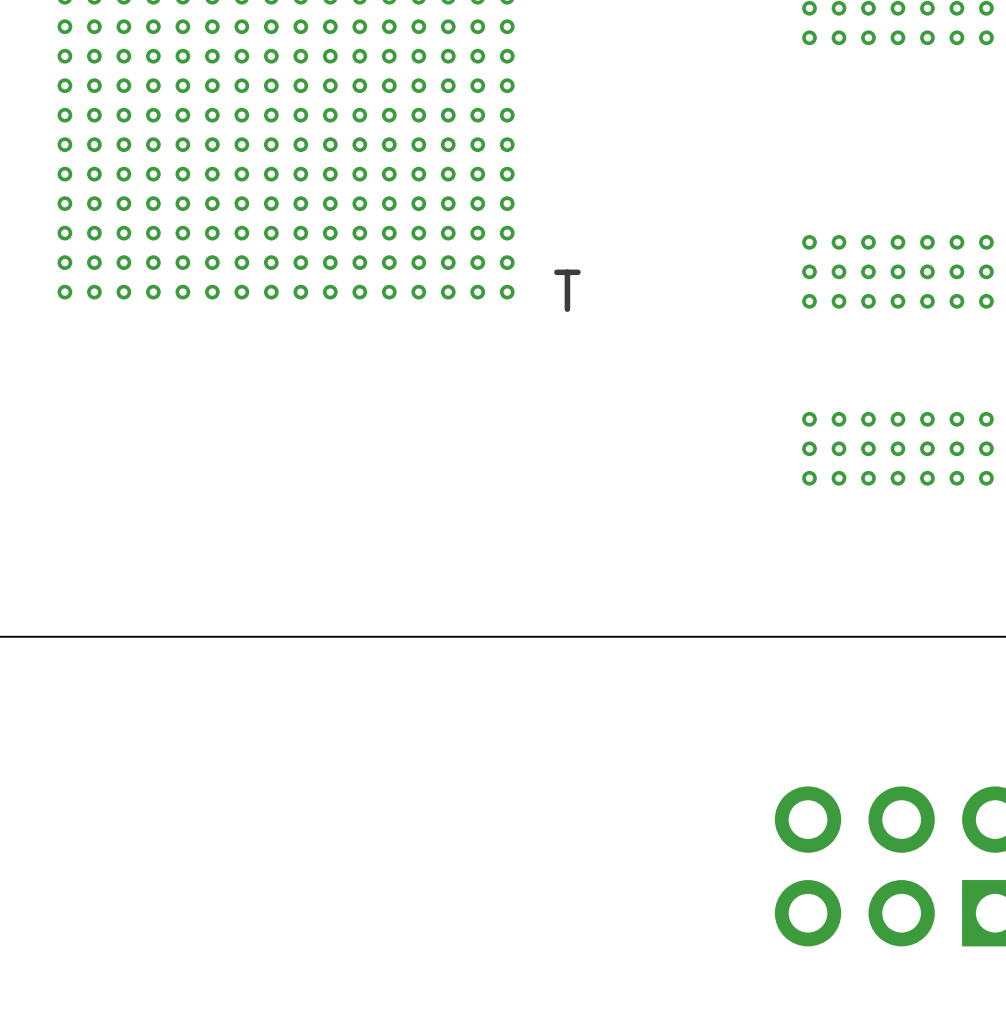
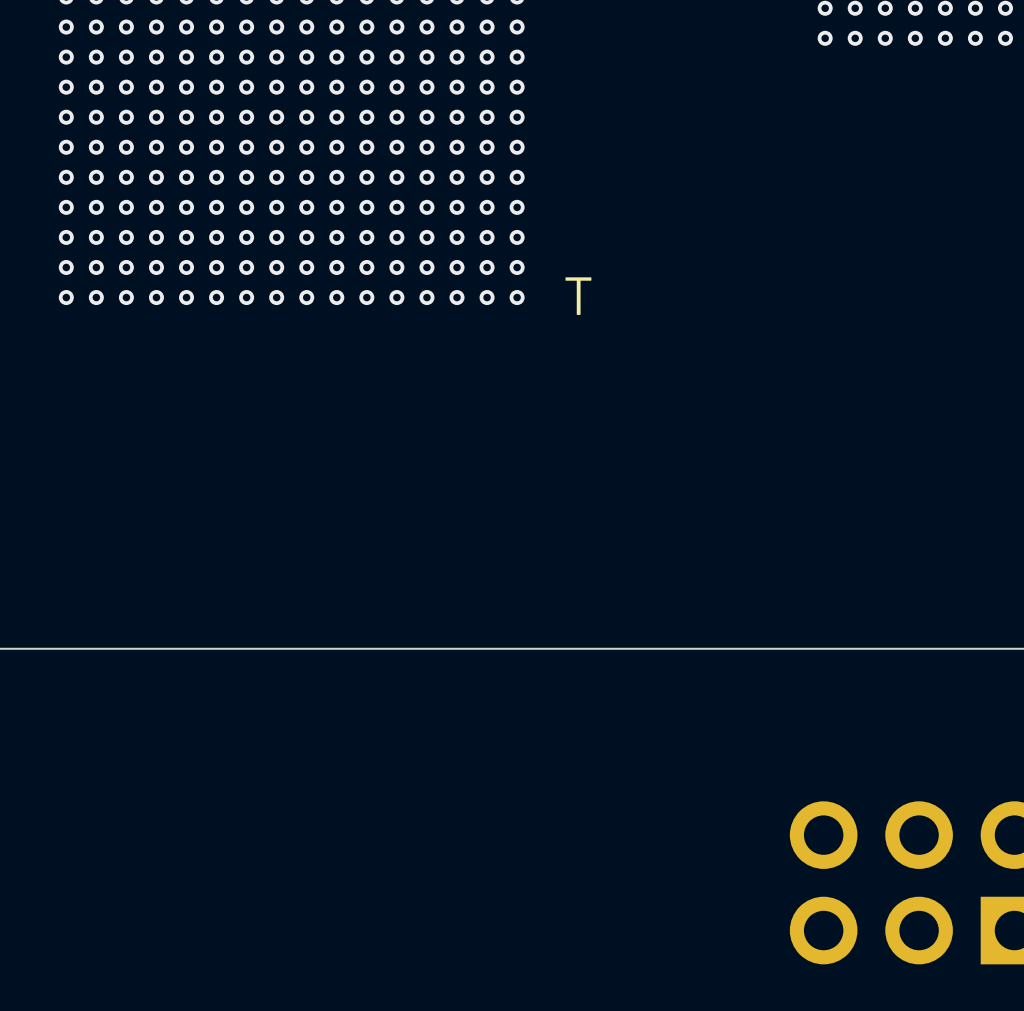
via: (809, 242) -> none
via: (838, 242) -> none
via: (868, 242) -> none
via: (897, 242) -> none
via: (927, 242) -> none
via: (956, 242) -> none
via: (986, 242) -> none
via: (809, 271) -> none
via: (838, 271) -> none
via: (868, 271) -> none
via: (897, 271) -> none
via: (927, 271) -> none
via: (956, 271) -> none
via: (986, 271) -> none
via: (809, 301) -> none
via: (838, 301) -> none
via: (868, 301) -> none
via: (897, 301) -> none
via: (927, 301) -> none
via: (956, 301) -> none
via: (986, 301) -> none
via: (809, 419) -> none
via: (838, 419) -> none
via: (868, 419) -> none
via: (897, 419) -> none
via: (927, 419) -> none
via: (956, 419) -> none
via: (986, 419) -> none
via: (809, 448) -> none
via: (838, 448) -> none
via: (868, 448) -> none
via: (897, 448) -> none
via: (927, 448) -> none
via: (956, 448) -> none
via: (986, 448) -> none
via: (809, 478) -> none
via: (838, 478) -> none
via: (868, 478) -> none
via: (897, 478) -> none
via: (927, 478) -> none
via: (956, 478) -> none
via: (986, 478) -> none

